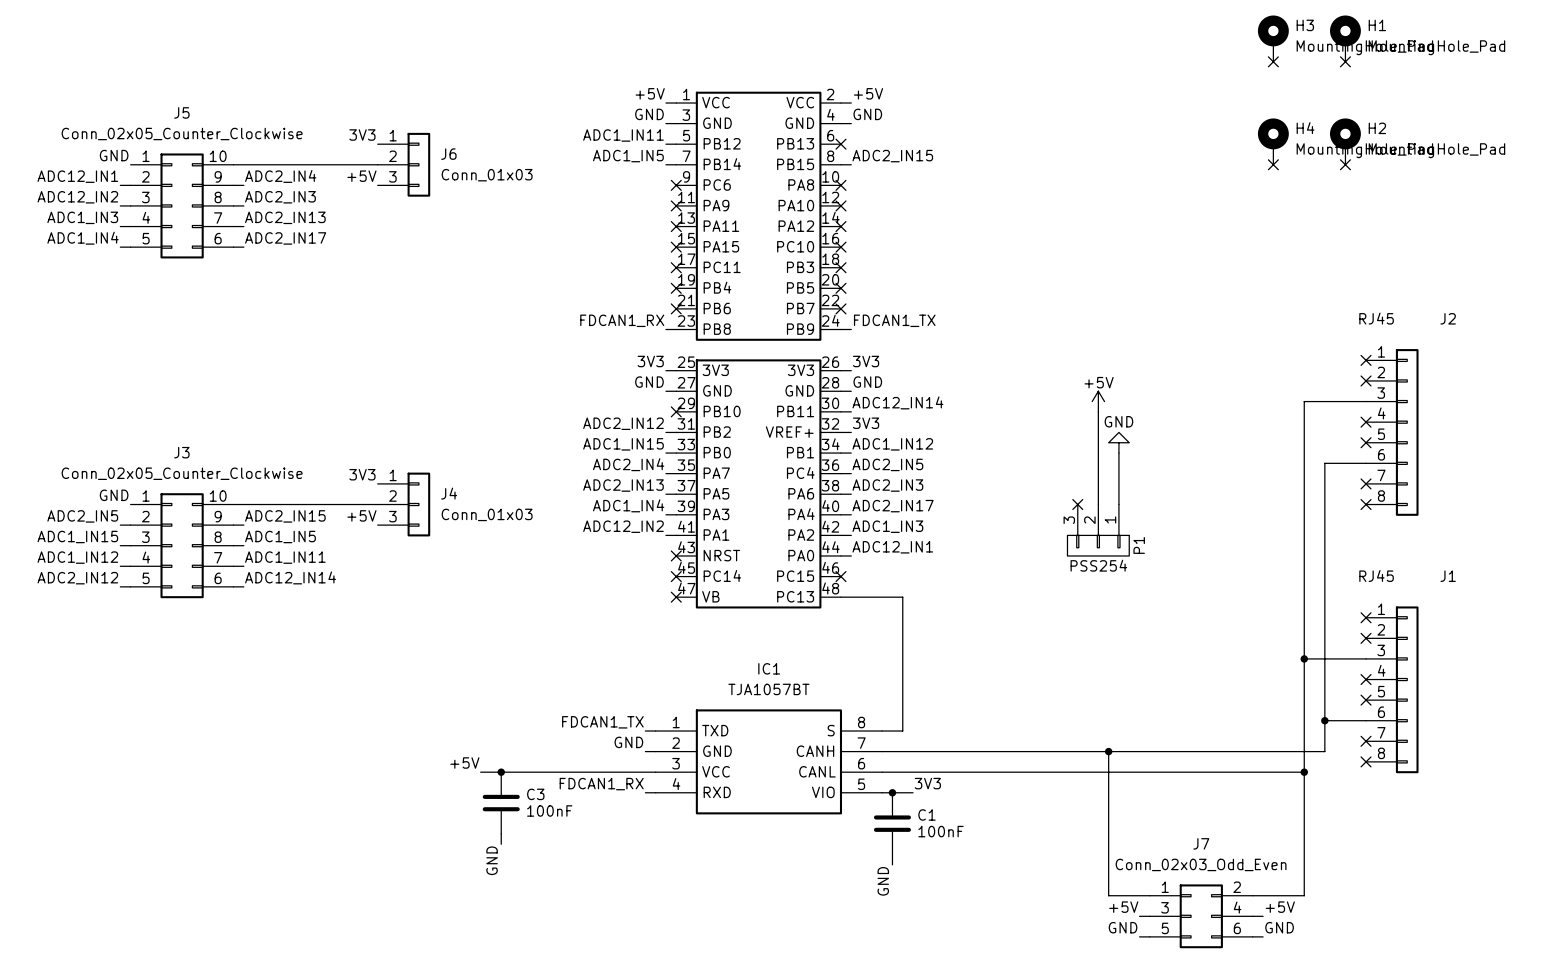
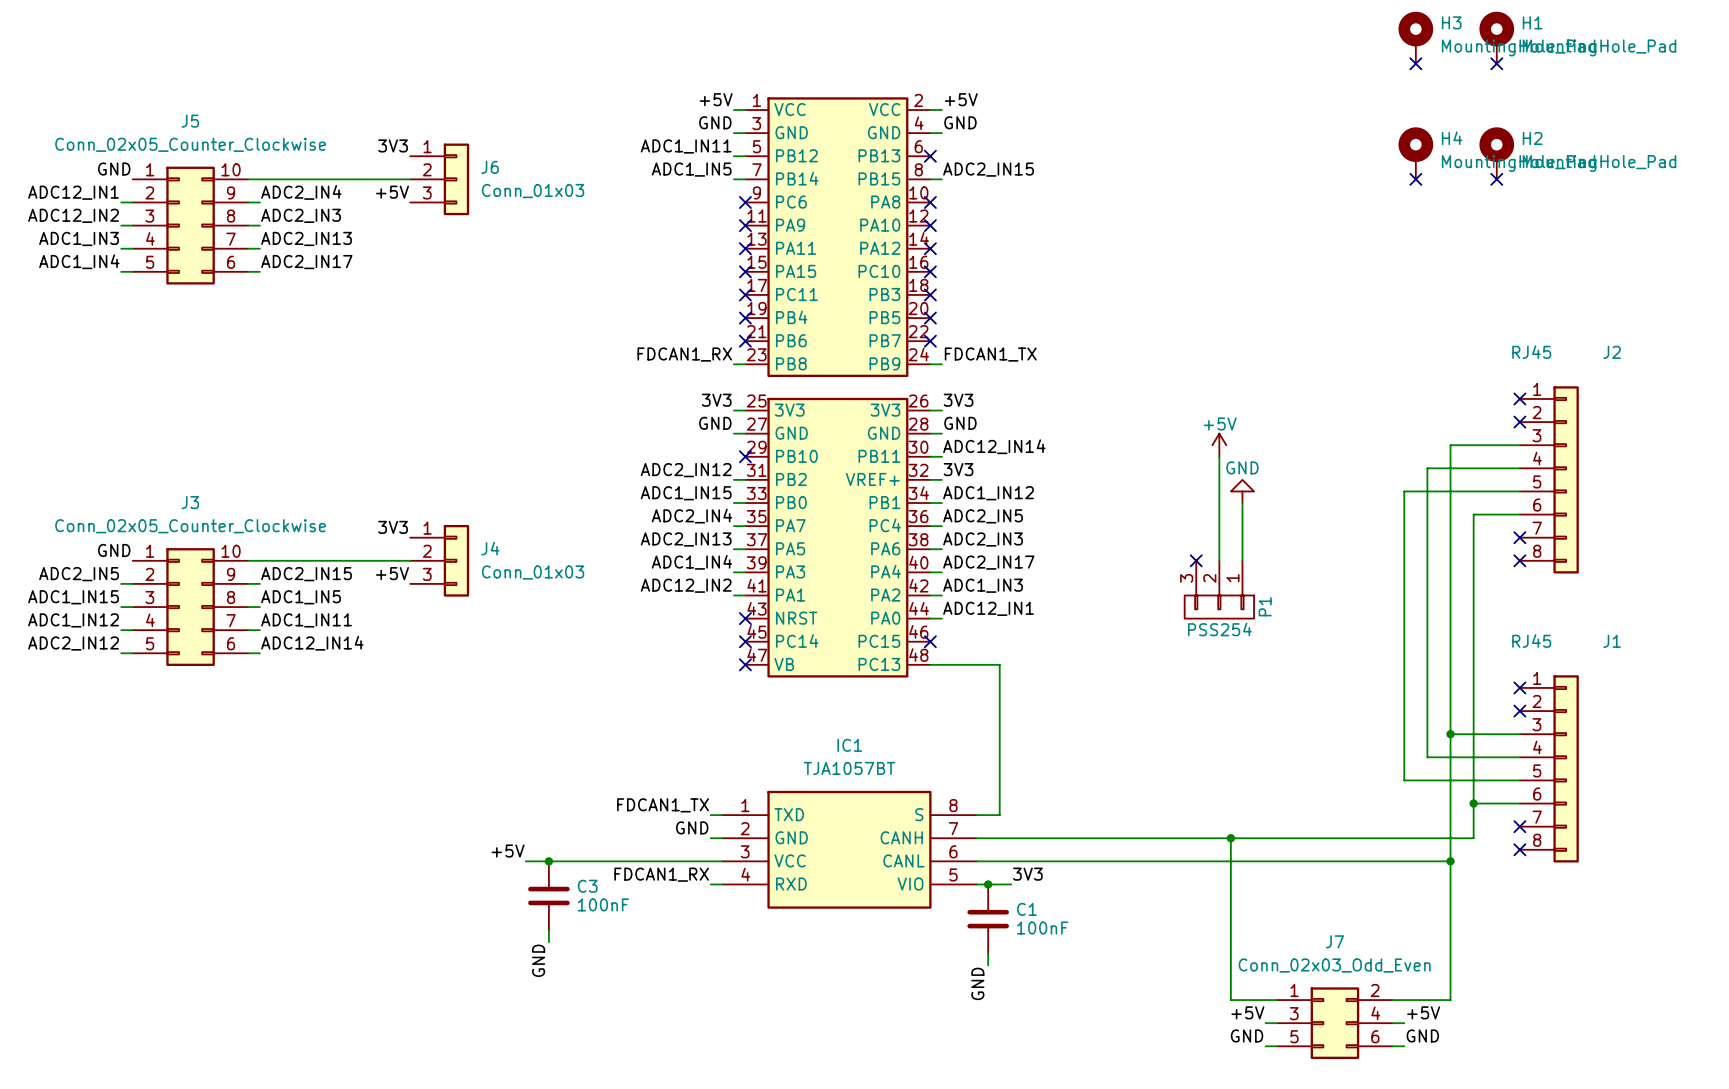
wire: none -> (1519, 468) (1427, 468) (1427, 757) (1519, 757)
no-connect mark: (1366, 422) -> none
wire: none -> (1519, 491) (1404, 491) (1404, 780) (1519, 780)
no-connect mark: (1366, 442) -> none
no-connect mark: (1366, 679) -> none
no-connect mark: (1366, 700) -> none

